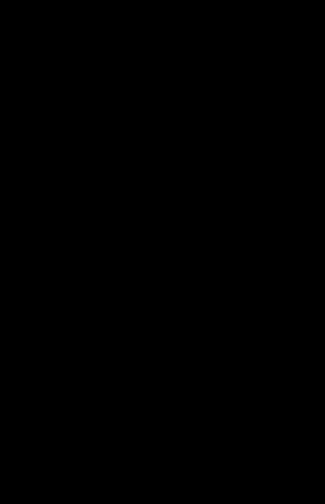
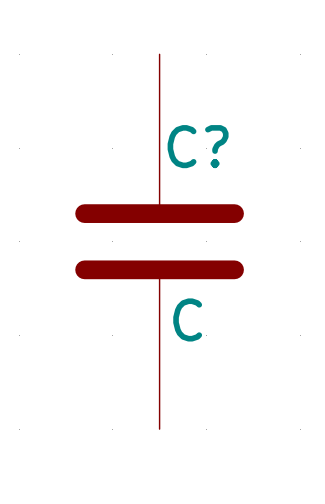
C?: none -> C (159, 241)

